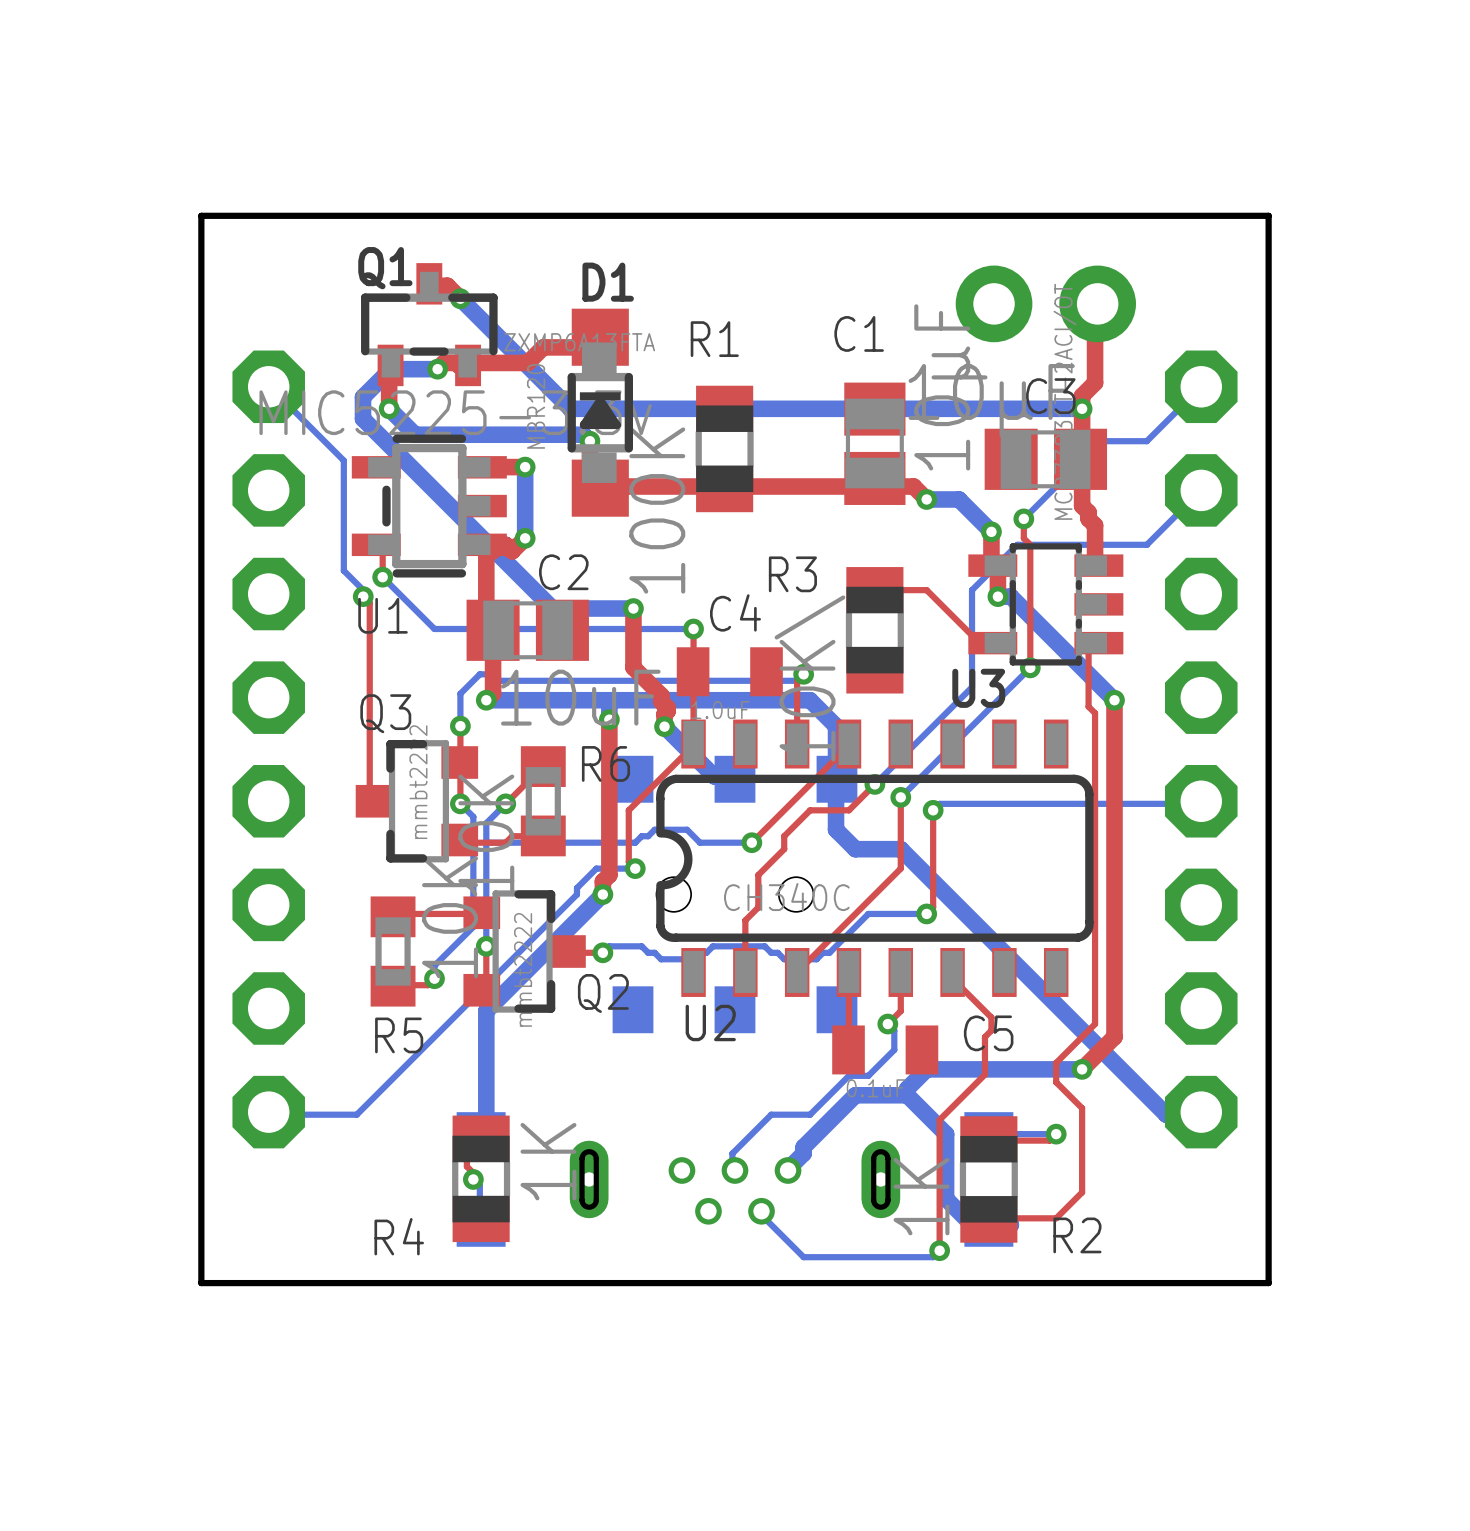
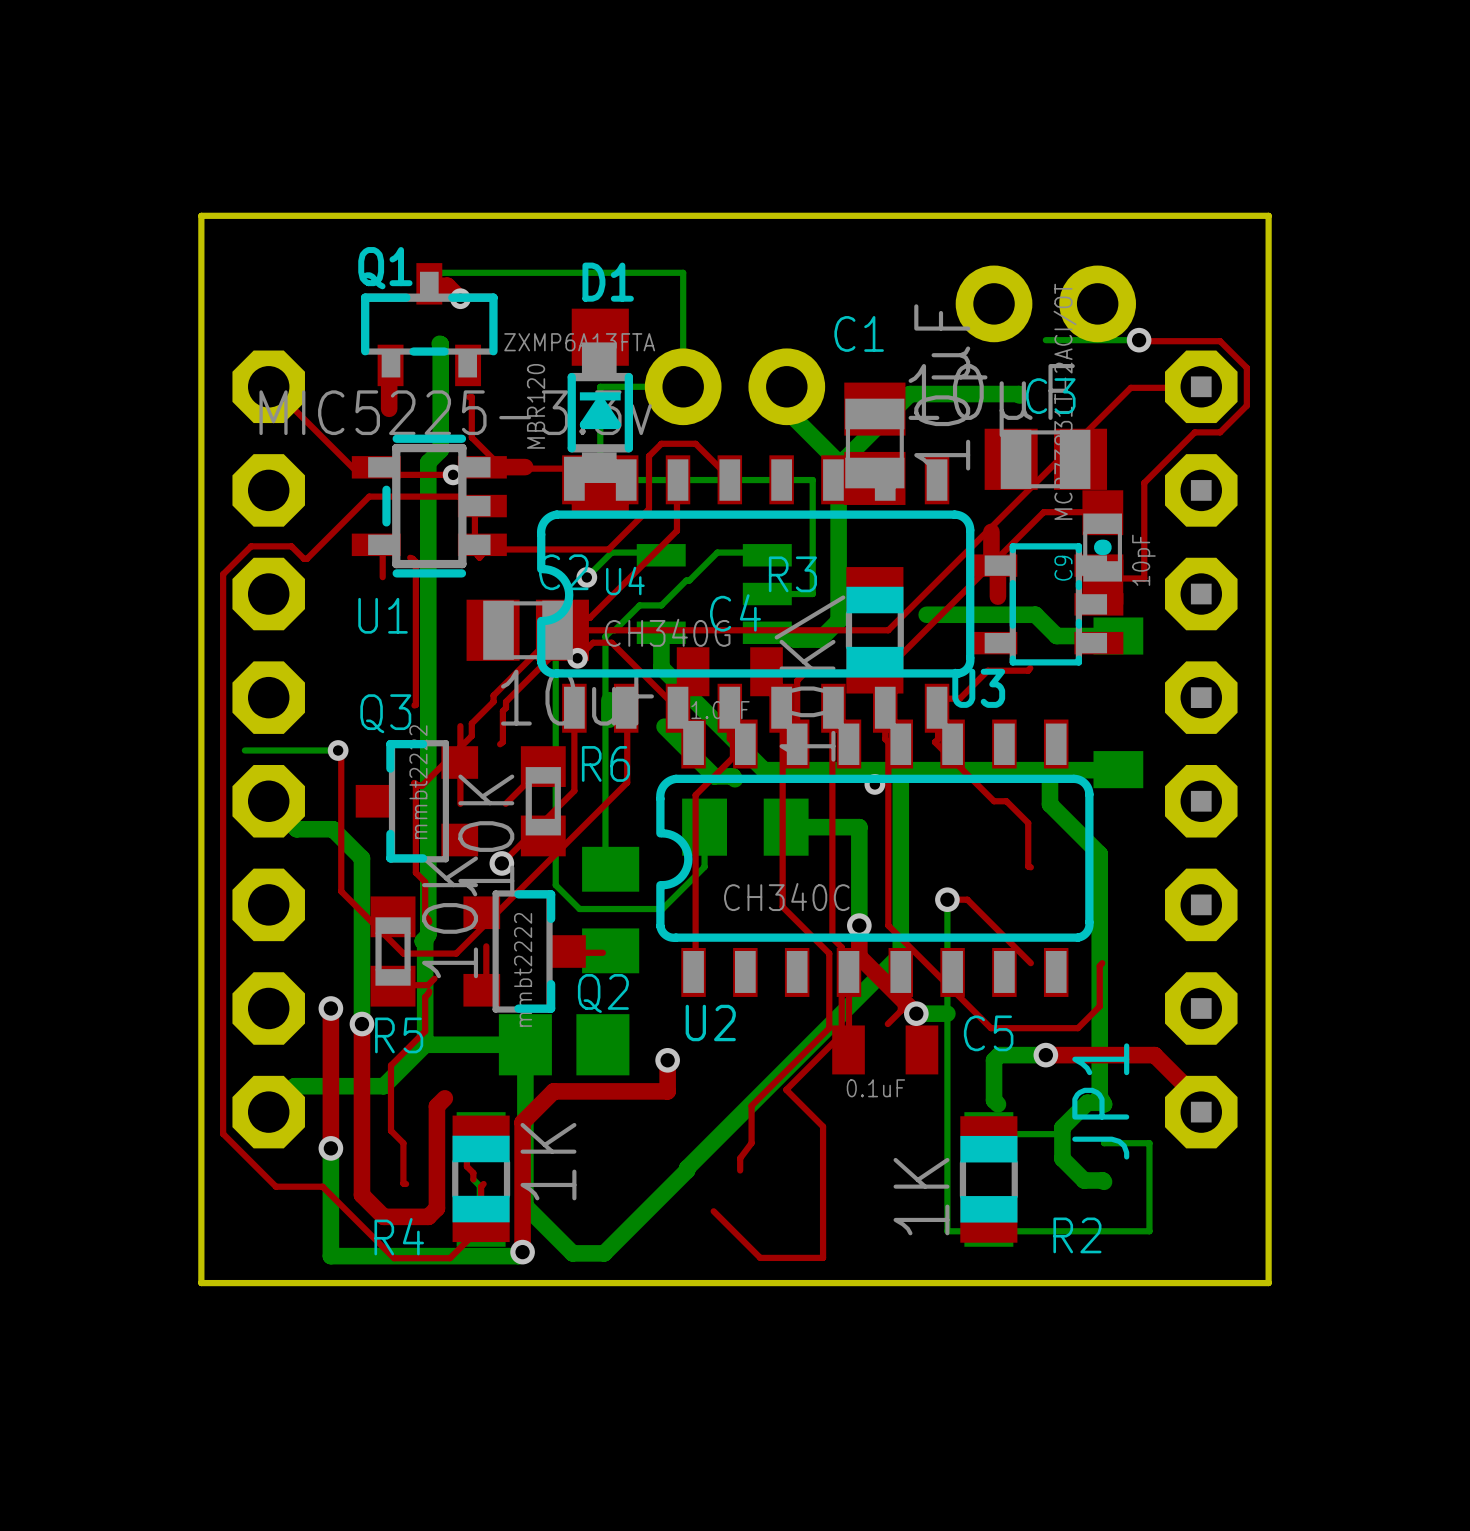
bottom track: none -> (439, 274) (441, 272) (683, 272) (683, 386) (600, 386) (600, 480) (812, 480) (812, 594) (767, 594)
bottom track: (460, 298) (570, 408) (1082, 408) -> none
top track: (1097, 303) (1095, 305) (1095, 382) (1082, 395) (1080, 459) (1082, 505) (1088, 512) (1088, 518) (1095, 525) (1095, 564) (1098, 565) -> none
top track: (600, 337) (589, 347) (543, 347) (527, 362) (468, 362) (468, 365) (459, 366) (456, 362) (443, 362) (437, 369) -> none
bottom track: none -> (1045, 340) (1139, 340)
top track: none -> (1139, 340) (1220, 341) (1246, 367) (1246, 405) (1220, 432) (1194, 432) (1144, 482) (1144, 578) (1106, 578) (1102, 582)
via: none -> (1139, 340)
bottom track: none -> (439, 343) (440, 450) (428, 462) (428, 934) (422, 941) (425, 941) (425, 1044)
bottom track: (437, 369) (390, 369) (363, 397) (363, 418) (552, 608) (633, 608) -> none
via: (437, 369) -> none
bottom track: (268, 386) (272, 389) (279, 389) (279, 395) (343, 460) (343, 570) (363, 590) (363, 596) -> none
top track: none -> (268, 386) (269, 384) (359, 474) (453, 474)
part: none -> (734, 386)
bottom track: none -> (786, 386) (788, 387) (788, 412) (838, 462)
bottom track: (1201, 386) (1198, 389) (1192, 389) (1192, 395) (1146, 441) (1101, 441) (1023, 518) -> none
top track: none -> (1201, 386) (1130, 387) (888, 630) (577, 630) (506, 701) (506, 708) (502, 711) (502, 742) (500, 744)
bottom track: none -> (1019, 395) (1018, 394) (910, 394) (844, 459) (838, 462)
top track: none -> (469, 397) (471, 397) (471, 437) (502, 468) (565, 468) (574, 479)
bottom track: (389, 408) (415, 434) (583, 434) (589, 441) -> none
via: (389, 408) -> none
via: (1082, 408) -> none
top track: (589, 441) (589, 486) (596, 493) (602, 486) (719, 486) (724, 489) (725, 486) (852, 486) (874, 478) (874, 486) (913, 486) (926, 499) -> none
via: (589, 441) -> none
R1 side: top (724, 448) -> bottom (610, 910)
bottom track: none -> (838, 462) (838, 620) (819, 639) (795, 639) (788, 633) (767, 632)
bottom track: (525, 467) (525, 538) -> none
via: (525, 467) -> none
via: none -> (453, 474)
top track: none -> (678, 479) (676, 530) (589, 617) (571, 617) (493, 695) (493, 701) (471, 723) (471, 735) (422, 785) (414, 783) (415, 872) (425, 882) (425, 916) (429, 922)
top track: none -> (729, 479) (695, 443) (661, 443) (648, 456) (648, 509) (608, 549) (487, 549) (479, 557) (474, 552) (474, 512) (459, 496) (369, 496) (307, 558) (303, 558) (291, 546) (251, 546) (223, 574) (223, 1133) (275, 1186) (322, 1186) (394, 1258) (450, 1258) (481, 1227) (481, 1186) (483, 1183)
bottom track: (1201, 490) (1198, 493) (1192, 493) (1192, 499) (1146, 544) (1017, 544) (972, 590) (972, 687) (874, 784) -> none
bottom track: (926, 499) (959, 499) (991, 531) -> none
via: (926, 499) -> none
top track: none -> (1102, 512) (1043, 512) (888, 667) (888, 673) (885, 676) (885, 739) (888, 742) (888, 925) (990, 1028) (1077, 1028) (1099, 1006) (1099, 966) (1102, 963)
top track: (1023, 518) (1023, 538) (1030, 544) (1030, 667) -> (1030, 867) (1028, 866) (1028, 823) (1006, 801) (994, 801) (934, 742) (938, 739) (937, 708) (947, 698) (959, 698) (987, 670) (1028, 670) (1030, 668)
via: (1023, 518) -> none
via: (991, 531) -> none
top track: (525, 538) (512, 551) (505, 544) (492, 544) (492, 551) (482, 544) (486, 551) (486, 623) (493, 630) (493, 693) (486, 700) -> none
via: (525, 538) -> none
C9: none -> 10pF (1102, 547)
bottom track: none -> (661, 555) (658, 552) (611, 552) (586, 577)
bottom track: none -> (767, 555) (767, 552) (717, 552) (661, 605) (639, 605) (614, 630) (611, 630) (605, 636) (605, 866) (610, 869)
top track: none -> (410, 557) (415, 561) (414, 705)
bottom track: (382, 577) (434, 628) (693, 628) -> none
via: (382, 577) -> none
via: none -> (586, 577)
top track: (874, 590) (926, 590) (972, 635) (972, 641) (992, 643) -> none
part: none -> (714, 594)
U4: none -> CH340G (755, 594)
top track: (363, 596) (369, 603) (369, 797) (374, 801) -> none
via: (363, 596) -> none
bottom track: (997, 596) (1010, 596) (1114, 700) -> none
via: (997, 596) -> none
bottom track: none -> (555, 605) (555, 885) (579, 909) (662, 909) (704, 866) (704, 827)
top track: (633, 608) (633, 667) (661, 695) (661, 701) (667, 708) (664, 714) (664, 726) -> none
via: (633, 608) -> none
bottom track: none -> (926, 614) (1035, 614) (1056, 636) (1118, 636)
top track: (693, 628) (693, 752) (687, 752) (628, 810) (628, 862) (635, 868) -> none
via: (693, 628) -> none
bottom track: none -> (661, 633) (661, 667) (764, 770) (1118, 770)
top track: (1098, 643) (1088, 641) (1088, 706) (1095, 713) (1095, 1024) (1056, 1062) (1056, 1082) (1082, 1108) (1082, 1192) (1056, 1218) (990, 1218) (988, 1220) -> none
top track: none -> (577, 658) (593, 642) (611, 642) (678, 708)
via: none -> (577, 658)
bottom track: (1030, 667) (900, 797) -> none
via: (1030, 667) -> none
bottom track: (803, 674) (797, 680) (499, 680) (492, 674) (479, 674) (460, 693) (460, 726) -> none
via: (803, 674) -> none
bottom track: (486, 700) (810, 700) (836, 726) (836, 829) (855, 849) (900, 849) (1166, 1114) (1198, 1114) (1201, 1112) -> none
via: (486, 700) -> none
top track: (1114, 700) (1114, 1036) (1082, 1069) -> none
via: (1114, 700) -> none
part: none -> (1118, 702)
top track: none -> (574, 708) (574, 790) (501, 863)
top track: none -> (626, 708) (627, 782) (456, 953) (403, 953) (341, 891) (341, 753) (338, 750)
top track: none -> (729, 708) (729, 739) (732, 742) (732, 757) (695, 795) (695, 987)
top track: none -> (781, 708) (782, 906) (829, 953) (829, 1028) (751, 1105) (751, 1143) (740, 1158) (740, 1170)
top track: none -> (833, 708) (832, 938) (841, 947) (841, 1034) (786, 1089) (823, 1126) (823, 1257) (760, 1257) (713, 1211)
top track: (609, 719) (609, 875) (602, 881) (602, 894) -> none
via: (609, 719) -> none
via: (460, 726) -> none
via: (664, 726) -> none
top track: (848, 744) (751, 842) -> none
JP1 side: bottom (1201, 749) -> top (1201, 749)
bottom track: none -> (244, 750) (338, 750)
via: none -> (338, 750)
bottom track: none -> (900, 770) (900, 954) (604, 1253) (572, 1253) (525, 1206) (525, 1044) (425, 1044)
bottom track: none -> (1049, 770) (1049, 804) (1099, 854) (1099, 1096) (1104, 1104) (1087, 1102) (1062, 1127) (1062, 1158) (1084, 1180) (1104, 1181)
top track: (874, 784) (848, 810) (810, 810) (784, 836) (784, 849) (758, 875) (758, 907) (745, 920) (745, 972) -> none
top track: (900, 797) (900, 868) (797, 972) -> none
via: (900, 797) -> none
bottom track: none -> (268, 801) (296, 829) (332, 829) (361, 858) (361, 1024)
bottom track: (1201, 801) (1198, 803) (939, 803) (933, 810) -> none
bottom track: (460, 803) (473, 816) (473, 926) (434, 965) (434, 978) -> none
via: (460, 803) -> none
bottom track: (505, 803) (486, 823) (486, 946) -> none
via: (505, 803) -> none
top track: (933, 810) (933, 907) (926, 913) -> none
via: (933, 810) -> none
part: none -> (745, 827)
bottom track: none -> (786, 827) (859, 827) (859, 925)
top track: (543, 835) (512, 836) (505, 842) (460, 842) (459, 840) -> none
bottom track: (486, 842) (635, 842) (641, 836) (648, 836) (654, 829) (687, 829) (700, 842) (751, 842) -> none
via: (751, 842) -> none
via: none -> (501, 863)
bottom track: (635, 868) (596, 868) (576, 888) (576, 894) (356, 1114) (272, 1114) (268, 1112) -> (425, 1044) (383, 1086) (294, 1086) (268, 1112)
via: (635, 868) -> none
bottom track: (602, 894) (486, 1011) (486, 1134) (481, 1136) -> none
via: (602, 894) -> none
part: (734, 894) -> none
bottom track: none -> (947, 899) (947, 1231) (1149, 1231) (1149, 1143) (1104, 1143)
top track: none -> (947, 899) (967, 899) (1030, 963)
top track: (481, 912) (395, 913) (393, 916) -> none
bottom track: (926, 913) (868, 913) (829, 952) (823, 952) (816, 959) (784, 959) (777, 952) (771, 952) (764, 946) (712, 946) (706, 952) (693, 952) (687, 959) (661, 959) (654, 952) (648, 952) (641, 946) (609, 946) (602, 952) -> none
via position: (926, 913) -> (947, 899)
top track: none -> (859, 925) (859, 956) (916, 1013)
via: none -> (859, 925)
via: (486, 946) -> none
via: (602, 952) -> none
top track: (952, 972) (952, 978) (991, 1017) (991, 1030) (984, 1036) (984, 1074) (939, 1119) (939, 1250) -> none
via: (434, 978) -> none
top track: none -> (429, 991) (425, 997) (425, 1031) (390, 1065) (390, 1130) (403, 1143) (403, 1183) (406, 1183)
top track: none -> (330, 1008) (330, 1148)
via: none -> (330, 1008)
bottom track: none -> (916, 1013) (947, 1013)
via: none -> (916, 1013)
top track: none -> (361, 1024) (361, 1195) (383, 1216) (428, 1216) (436, 1208) (436, 1106) (444, 1098)
via: none -> (361, 1024)
bottom track: (887, 1024) (894, 1030) (894, 1049) (868, 1075) (848, 1075) (810, 1114) (771, 1114) (732, 1153) (732, 1160) (725, 1166) (725, 1172) (732, 1172) (734, 1170) -> none
via: (887, 1024) -> none
part: none -> (564, 1044)
bottom track: none -> (1045, 1055) (999, 1055) (994, 1060) (994, 1100) (997, 1104)
top track: none -> (1045, 1055) (1154, 1055) (1201, 1101) (1201, 1112)
via: none -> (1045, 1055)
top track: none -> (667, 1060) (667, 1091) (553, 1091) (522, 1122) (522, 1252)
via: none -> (667, 1060)
bottom track: (1082, 1069) (926, 1069) (907, 1088) (907, 1095) -> none
via: (1082, 1069) -> none
bottom track: (907, 1095) (946, 1134) (946, 1198) (972, 1224) (1010, 1224) (988, 1222) -> none
bottom track: (907, 1095) (855, 1095) (803, 1147) (803, 1153) (788, 1170) -> none
top track: (1056, 1134) (1049, 1140) (990, 1140) (988, 1138) -> none
via: (1056, 1134) -> none
bottom track: none -> (330, 1148) (330, 1256) (518, 1256) (522, 1252)
via: none -> (330, 1148)
via: (473, 1179) -> none
part: (734, 1182) -> none
bottom track: (761, 1211) (758, 1211) (803, 1257) (933, 1257) (939, 1250) -> none
via: (939, 1250) -> none
via: none -> (522, 1252)

